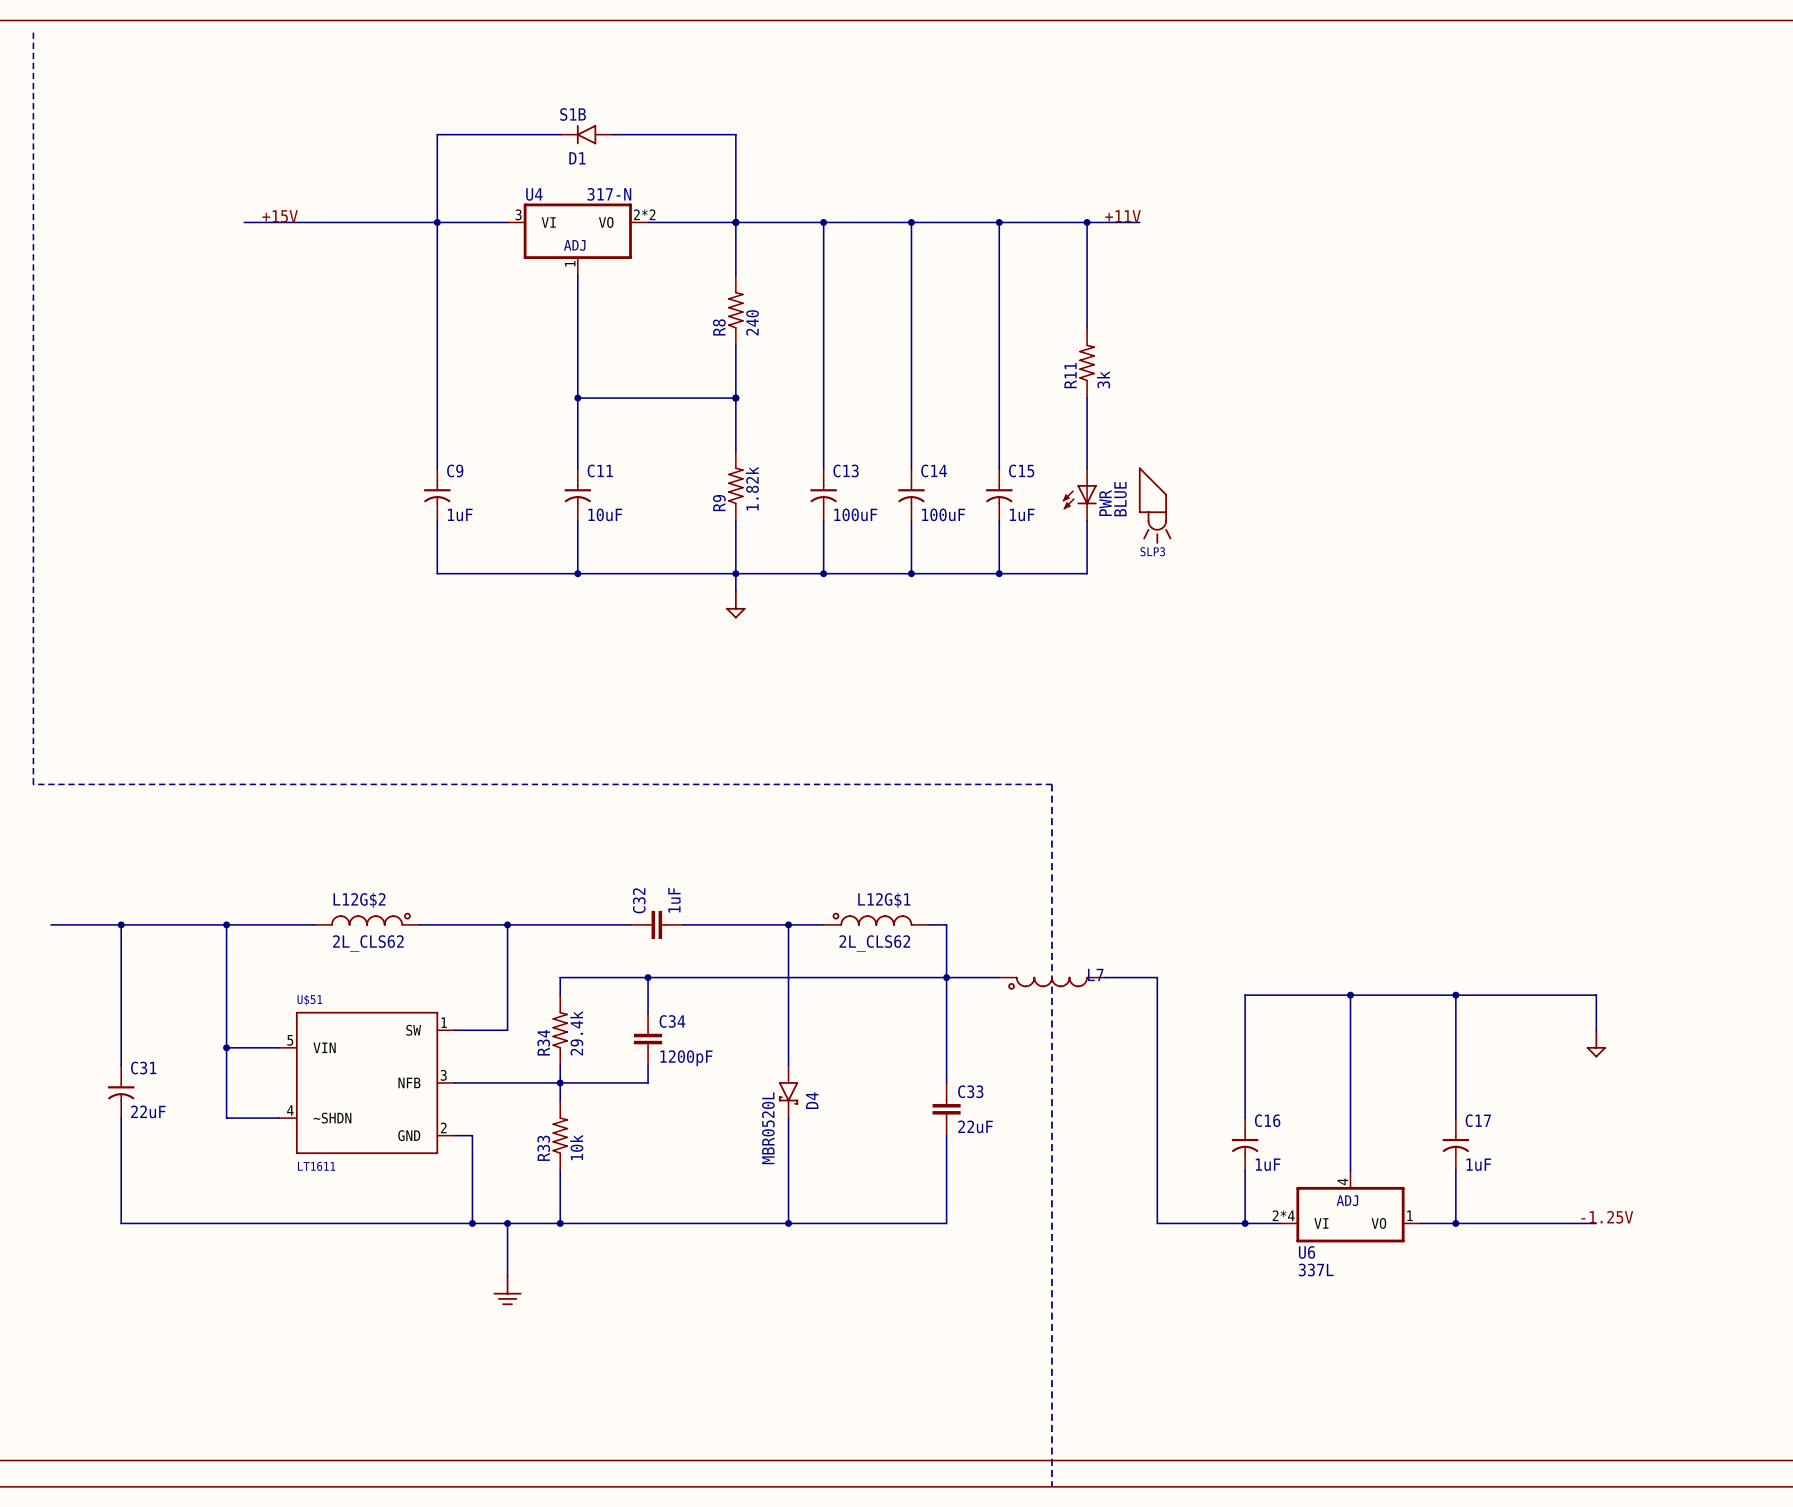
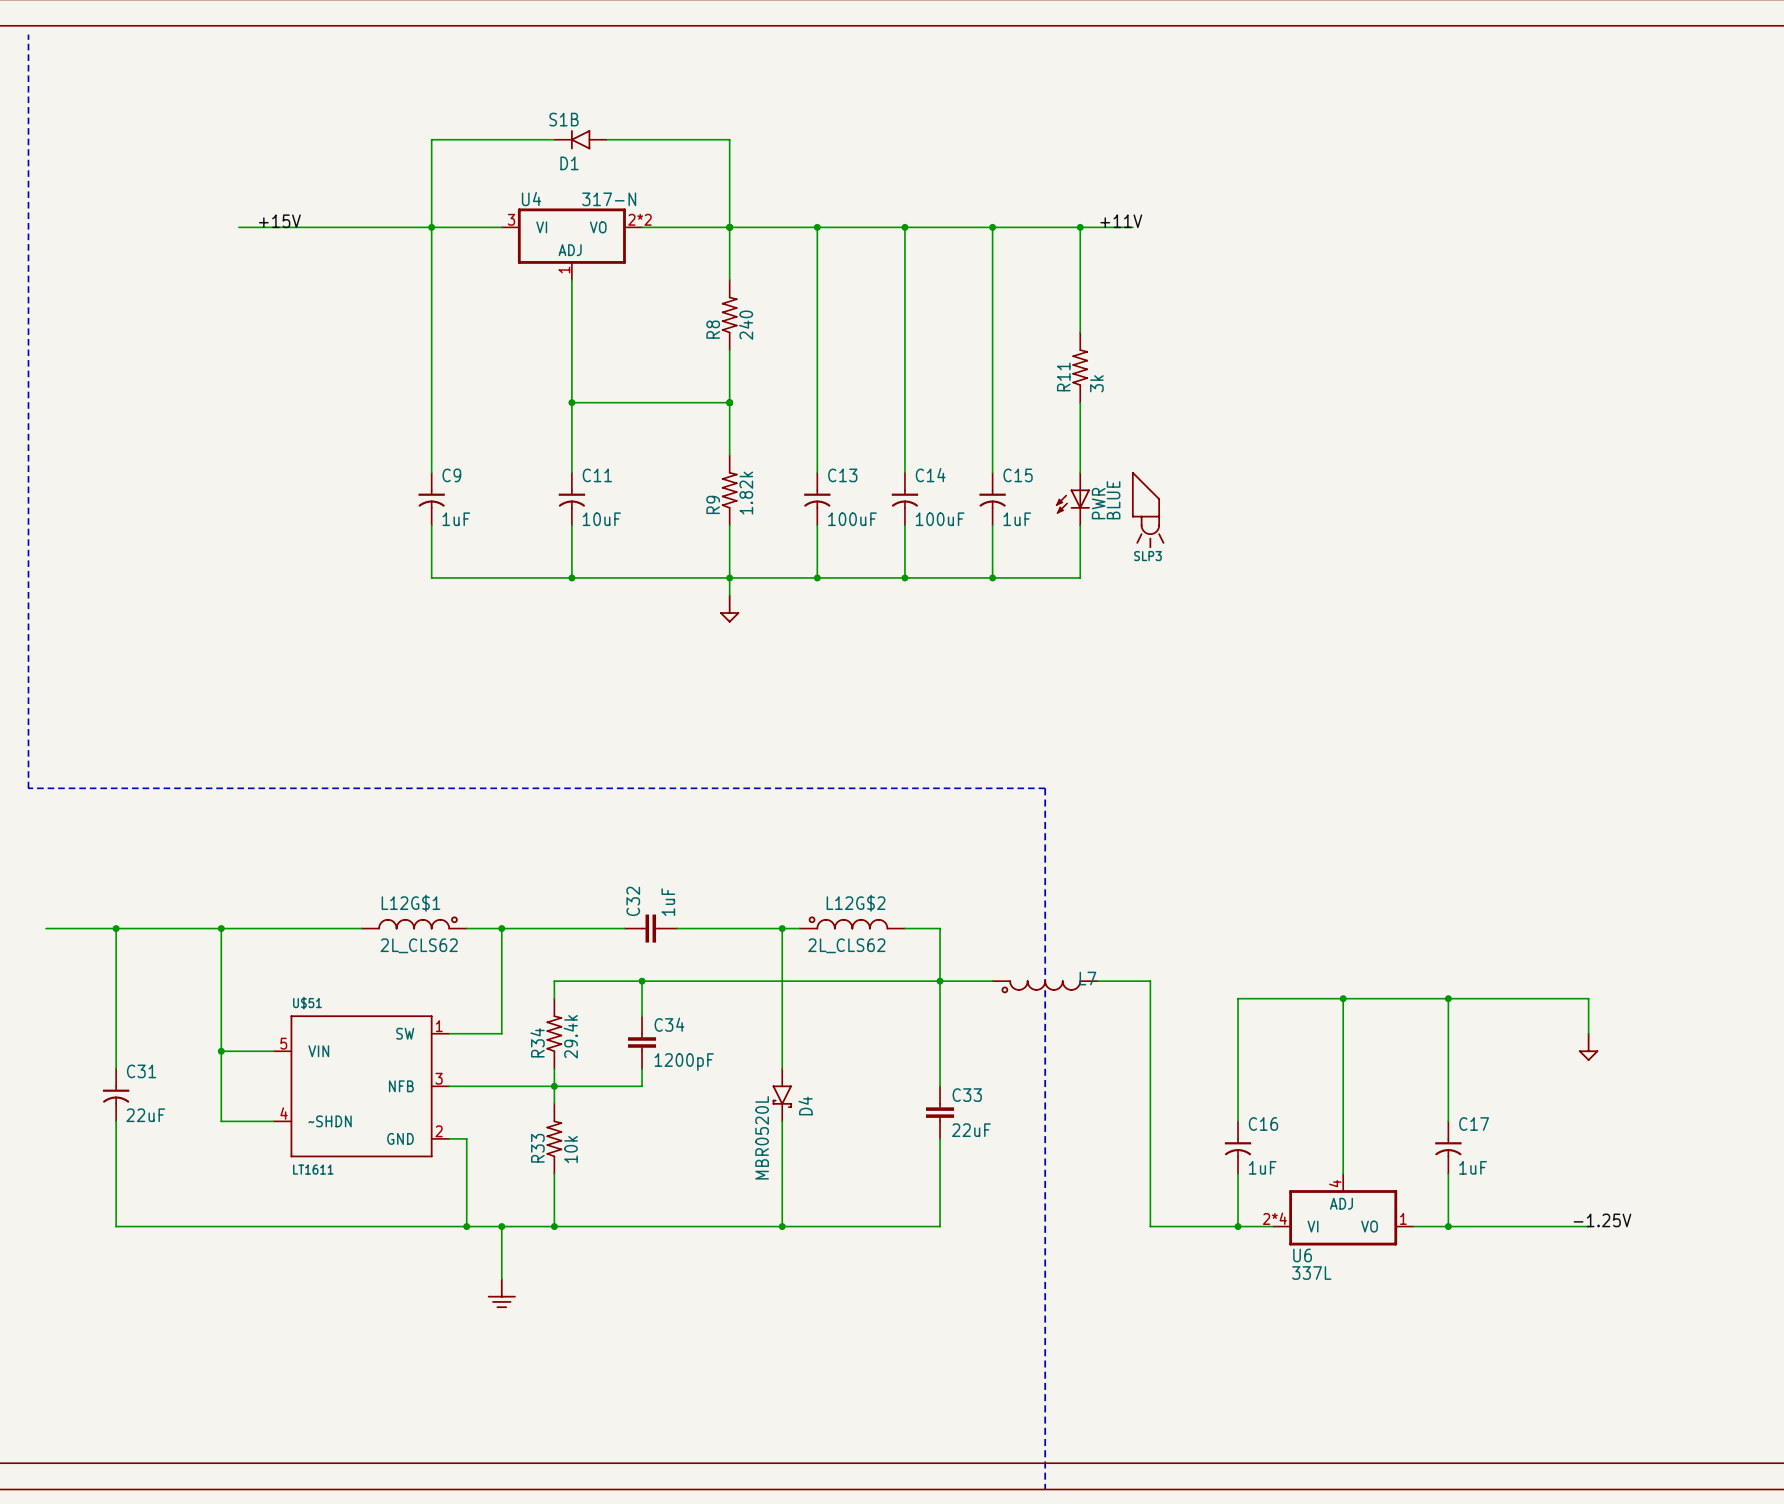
L12G$2 position: (367, 919) -> (852, 922)
L12G$2 flip: as is (370, 919) -> left-right (848, 922)
L12G$1 flip: as is (872, 919) -> left-right (418, 922)
L12G$1 position: (876, 919) -> (414, 922)
wire: (419, 924) (472, 924) -> (308, 928) (361, 928)

